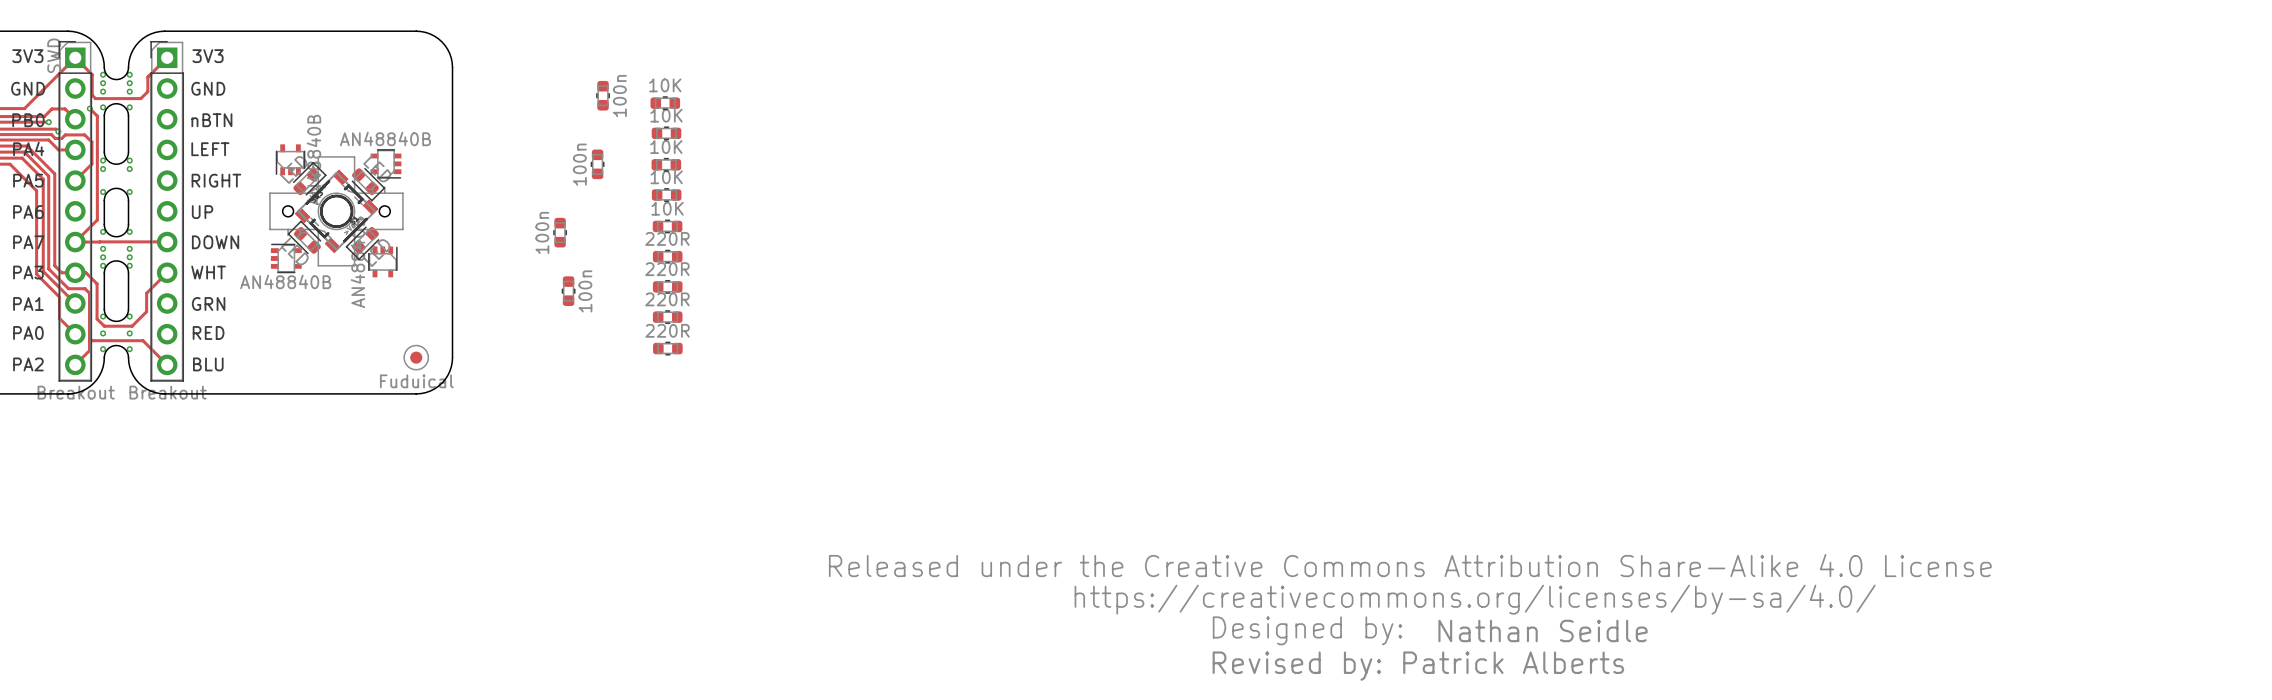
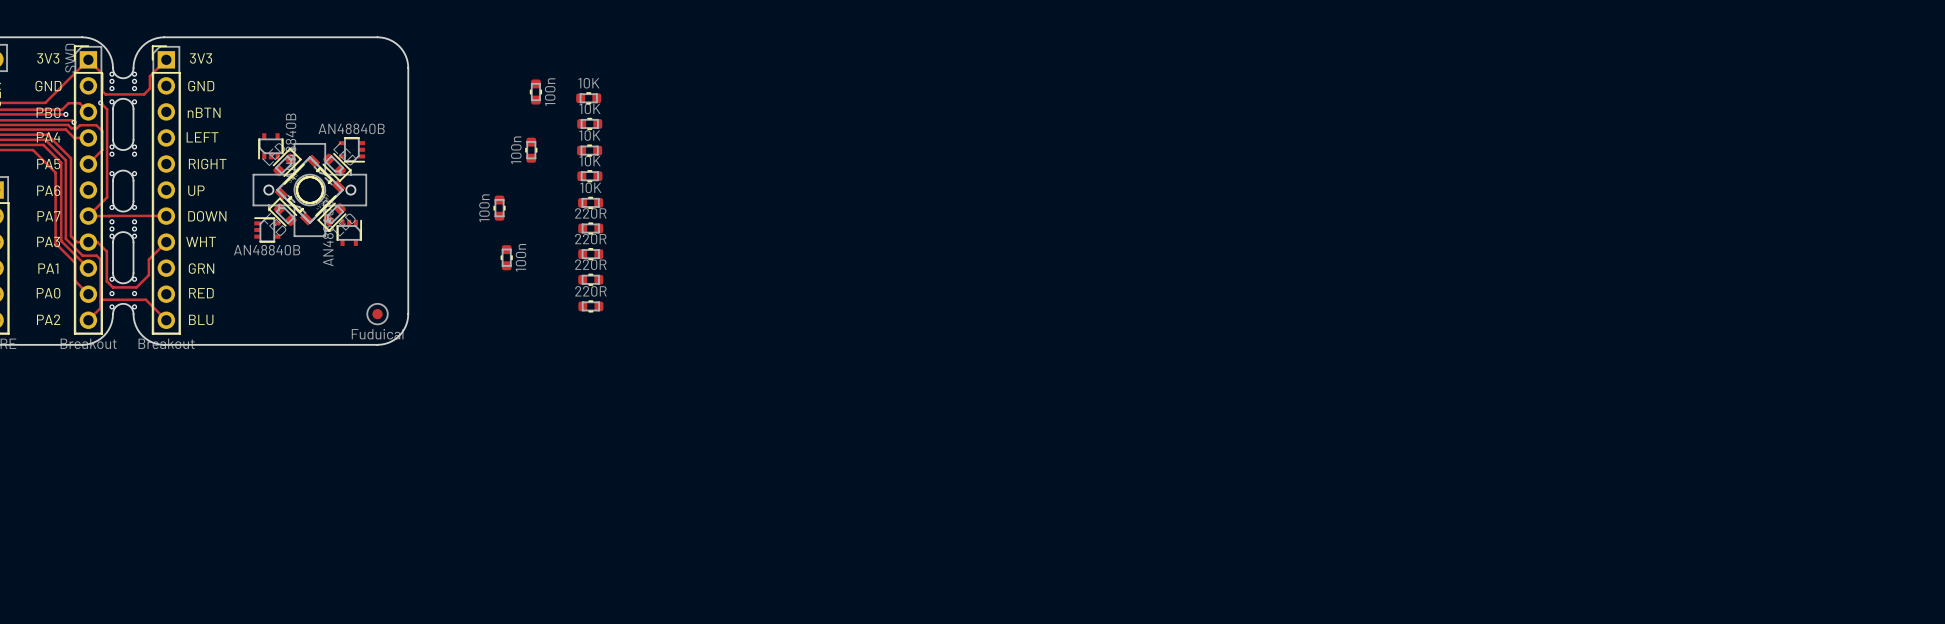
drawing: [828, 553, 1992, 646] -> none
text: Nathan Seidle (1543, 630) -> none
text: Revised by: Patrick Alberts (1418, 666) -> none

